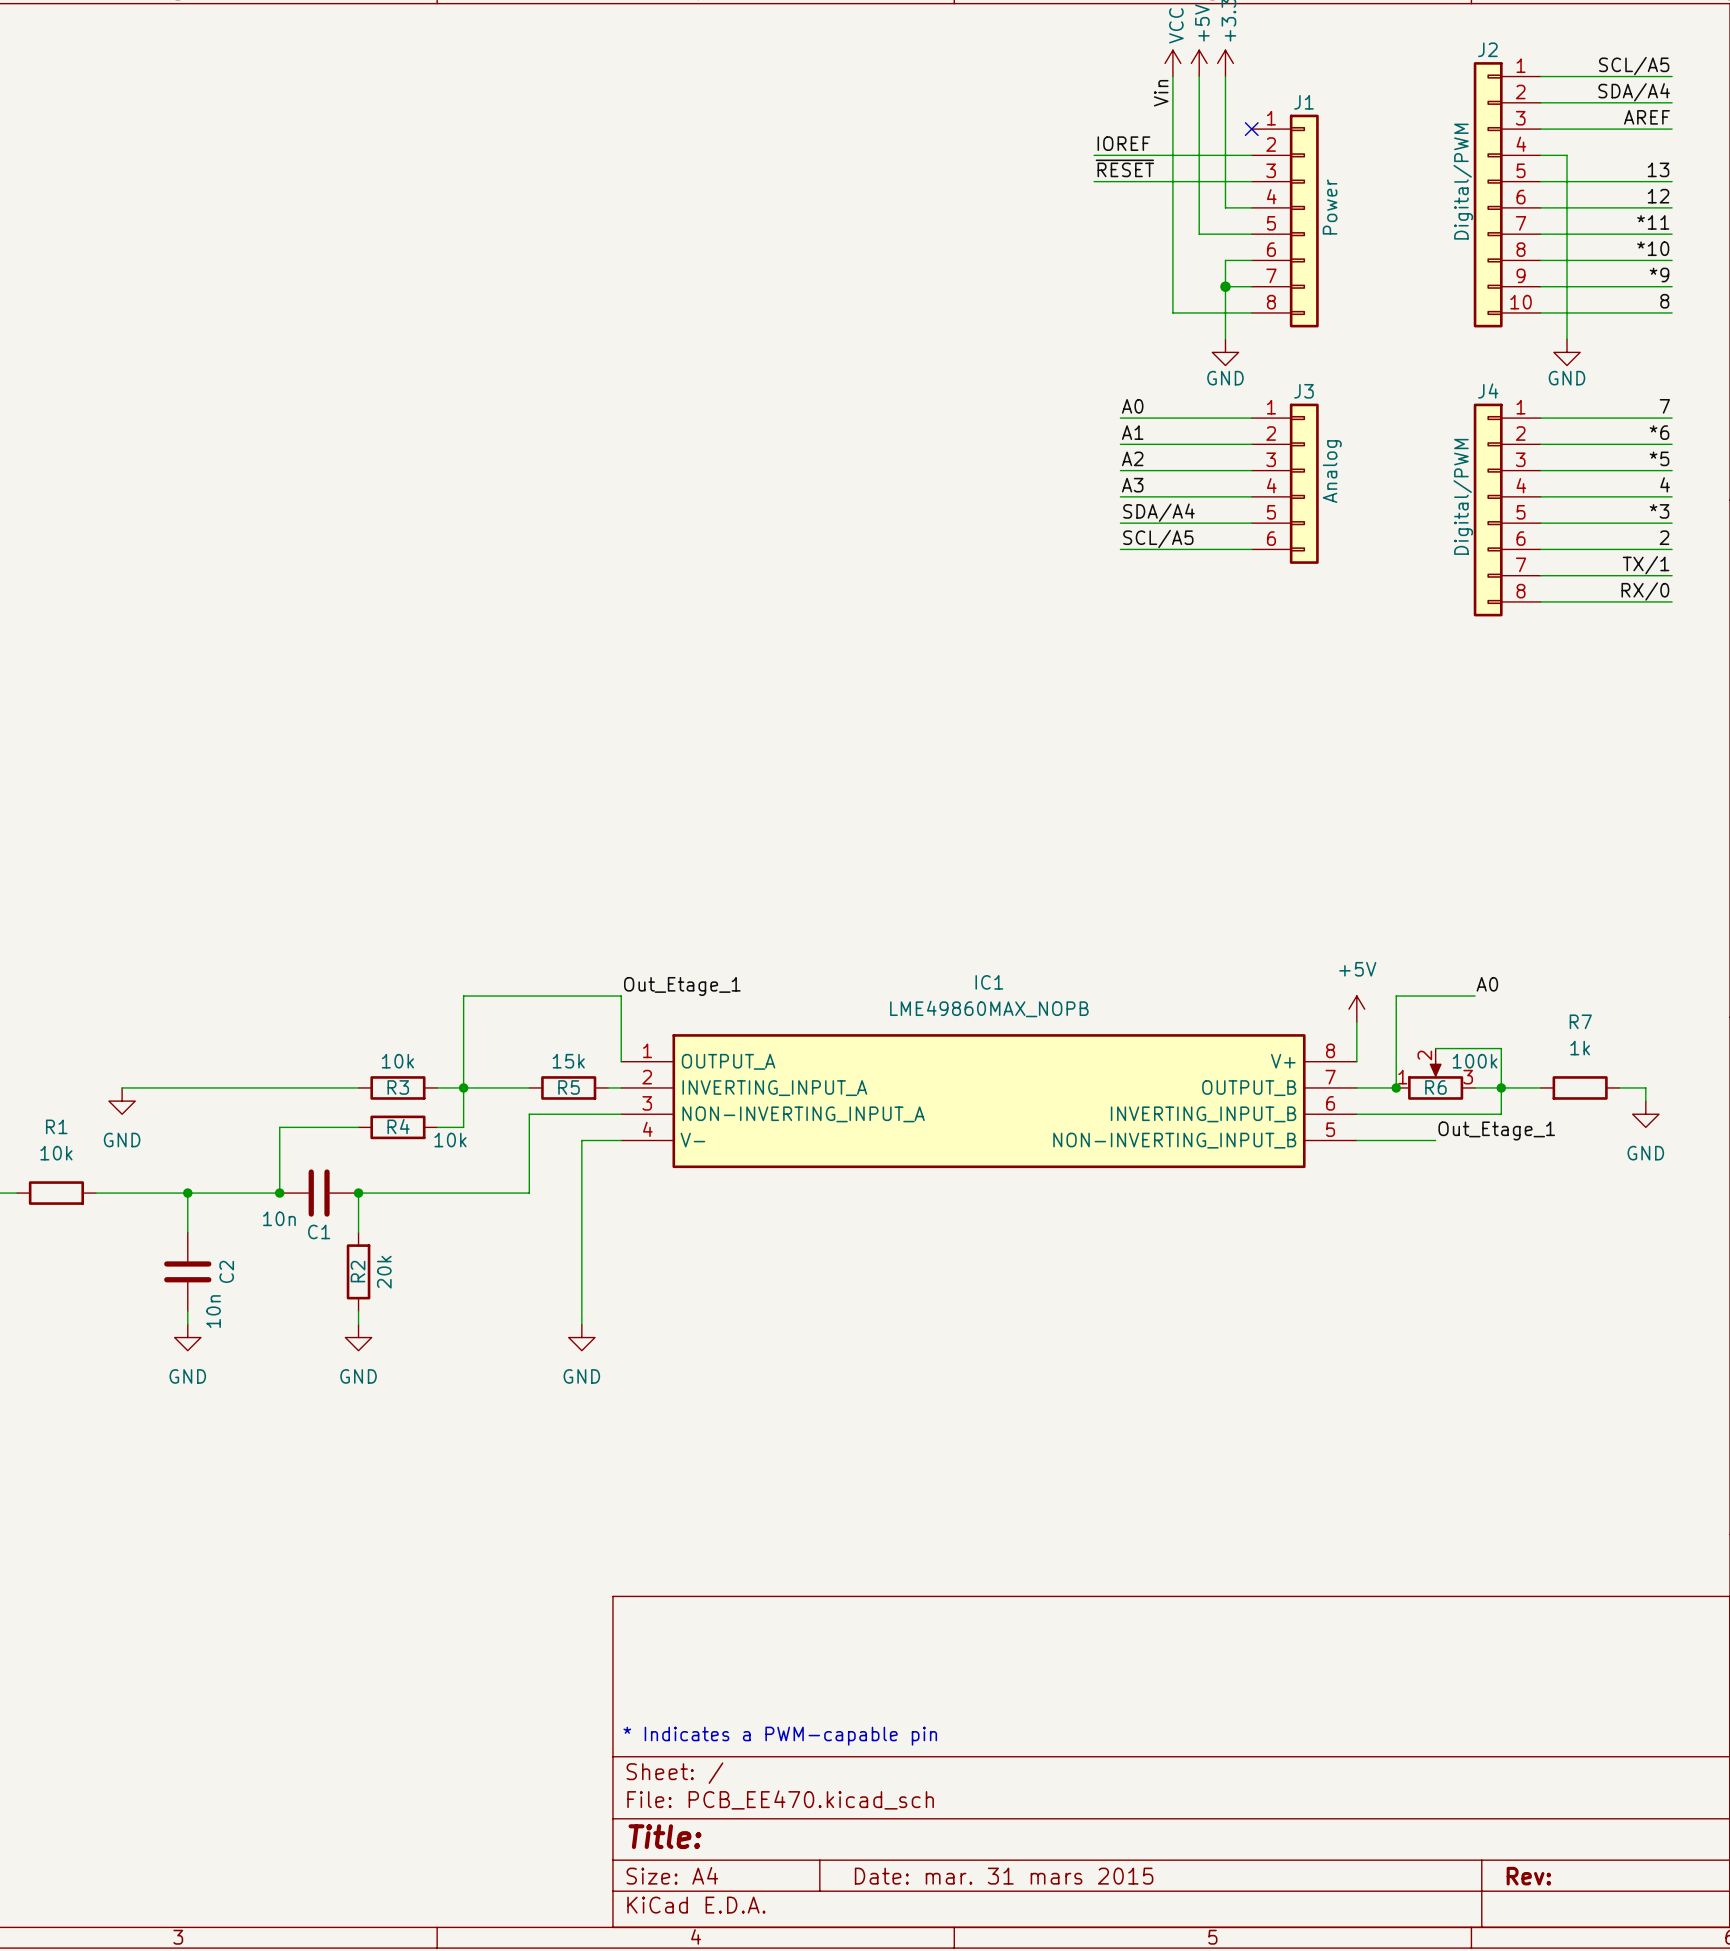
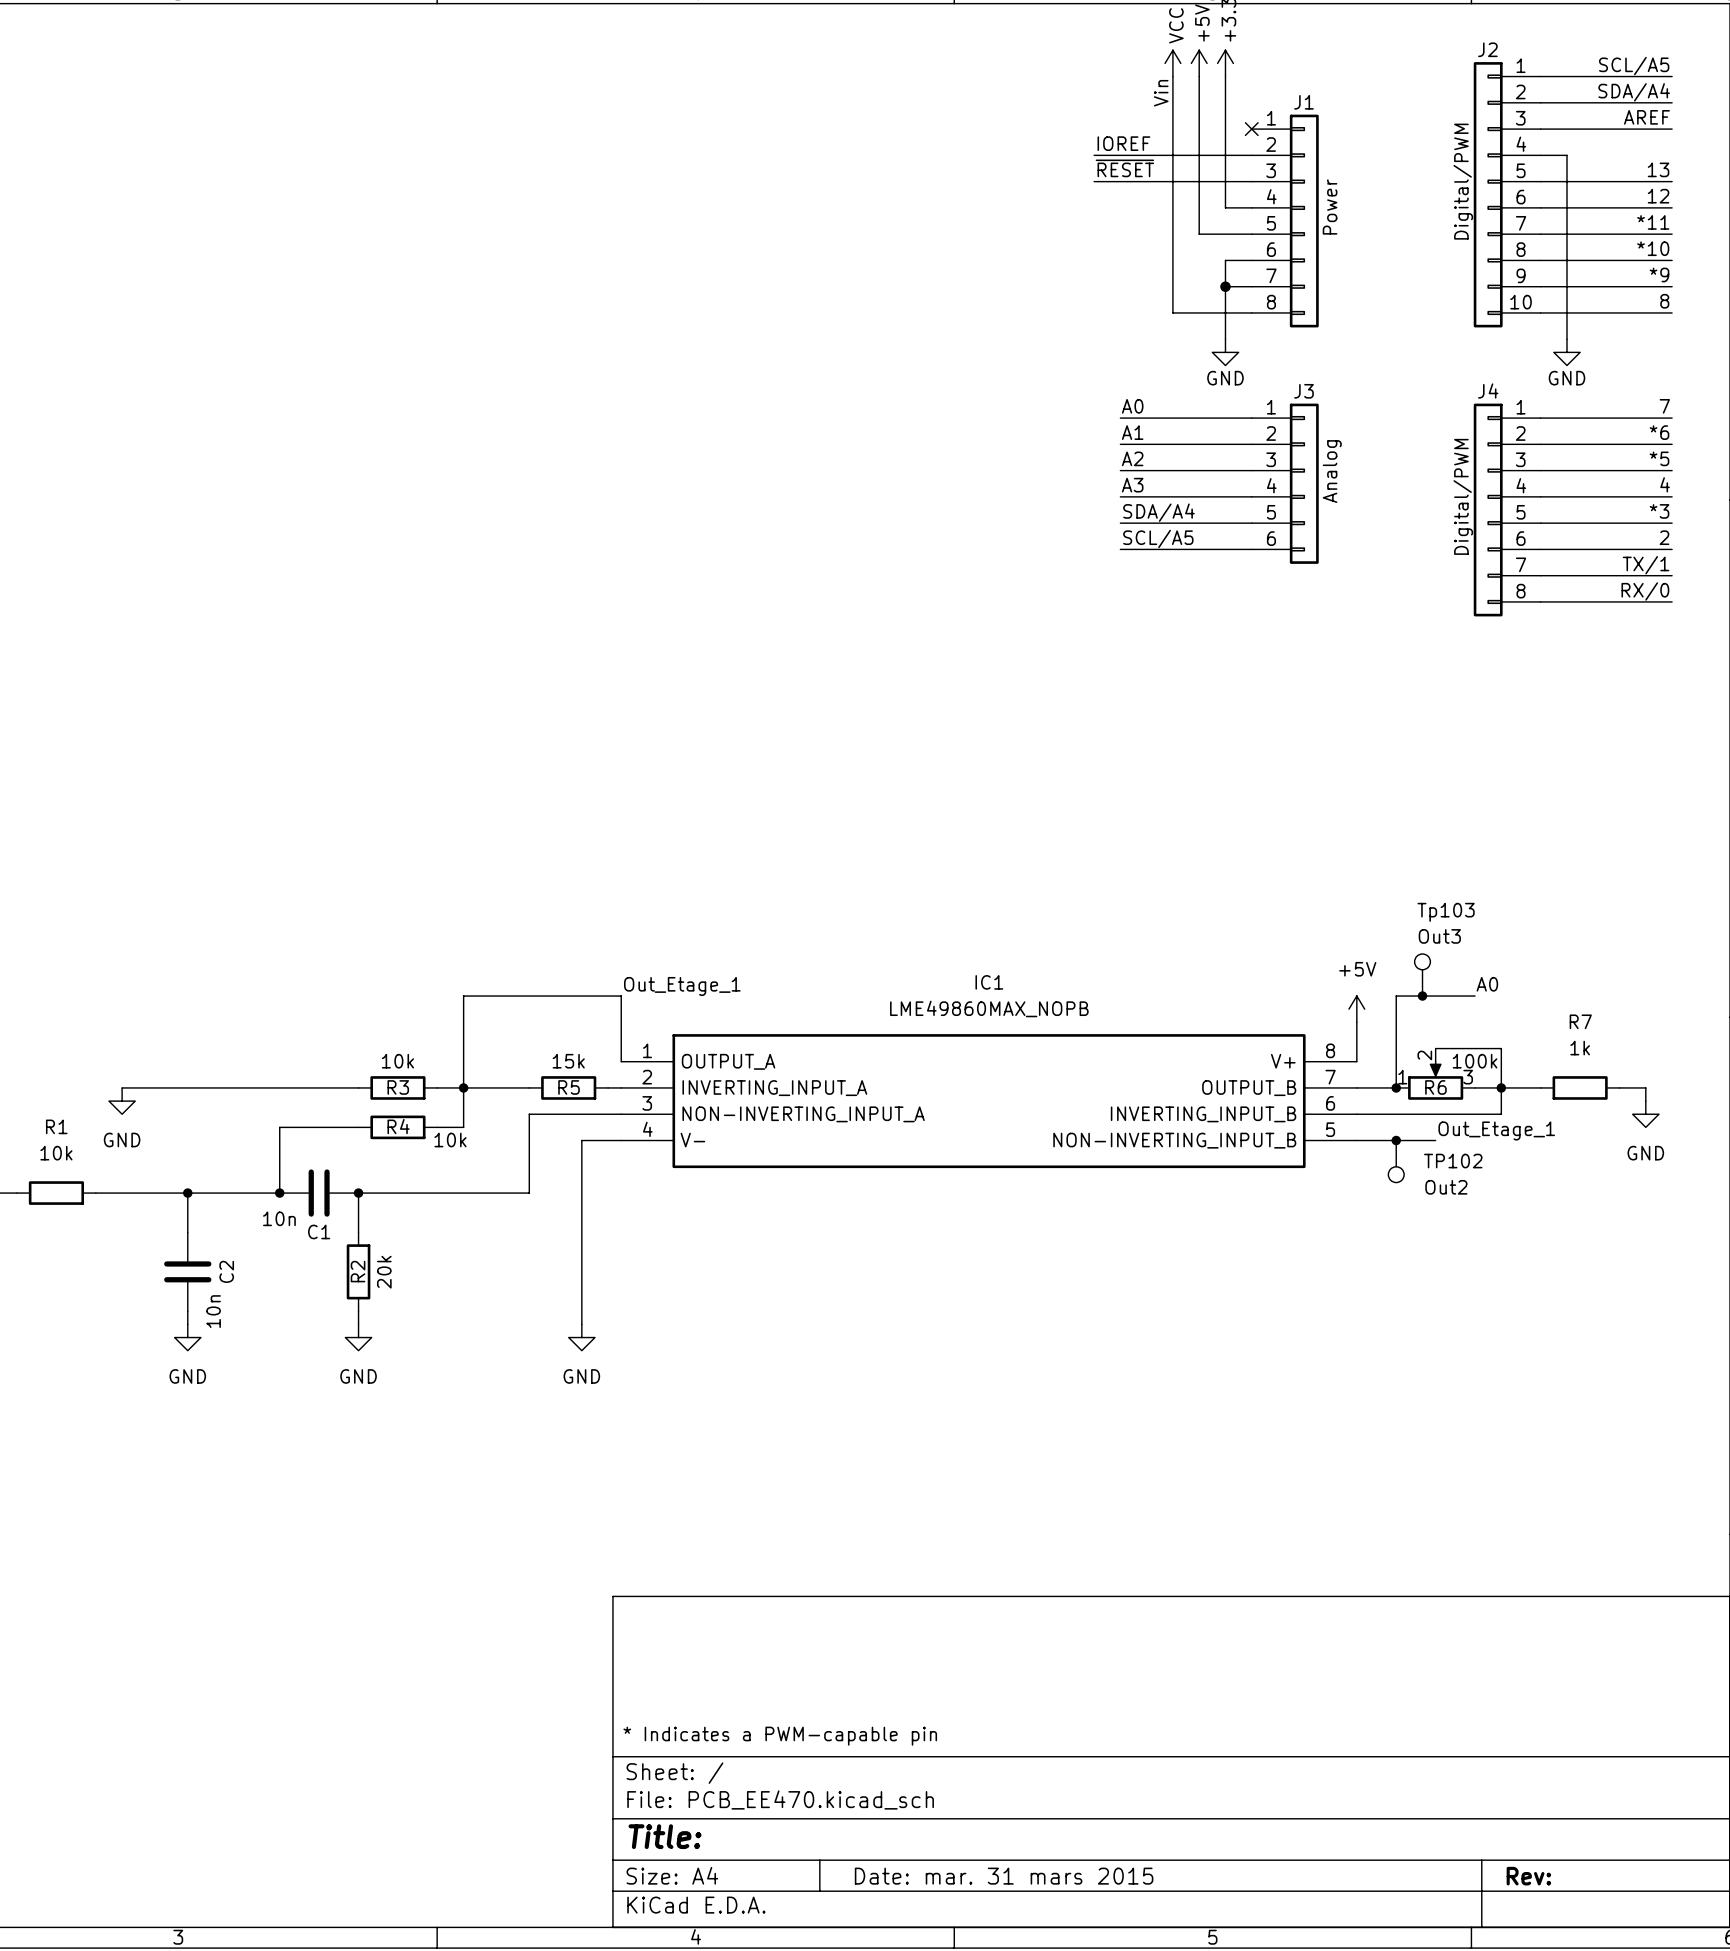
Tp103: none -> Out3 (1422, 975)
junction: none -> (1422, 996)
junction: none -> (1396, 1140)
TP102: none -> Out2 (1396, 1161)

